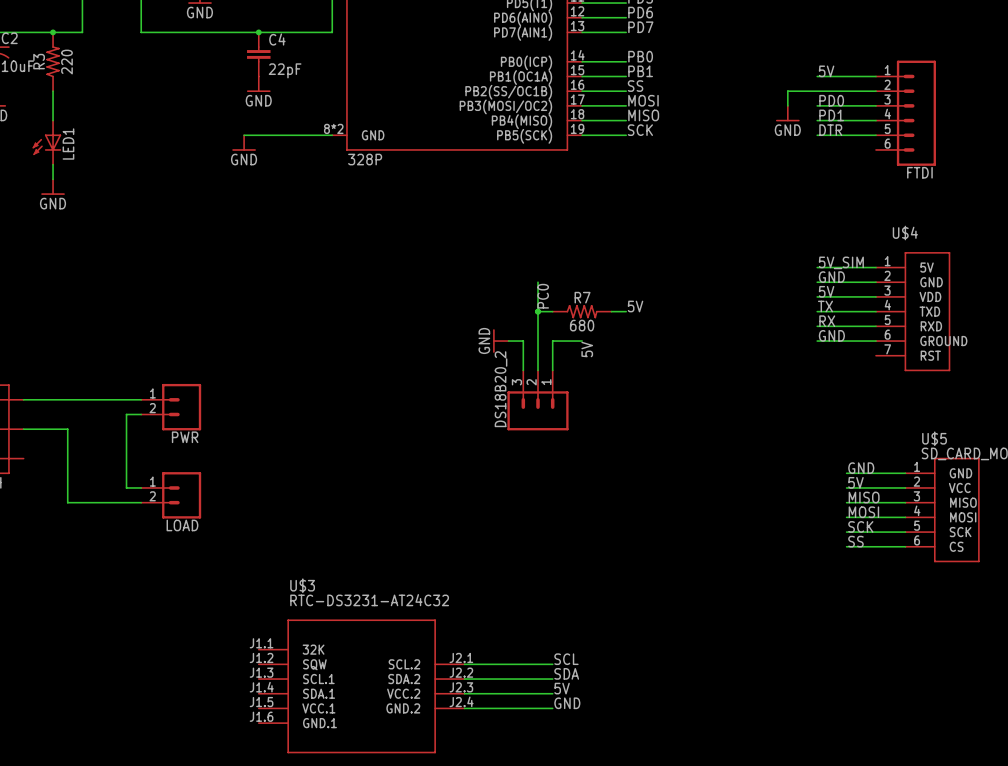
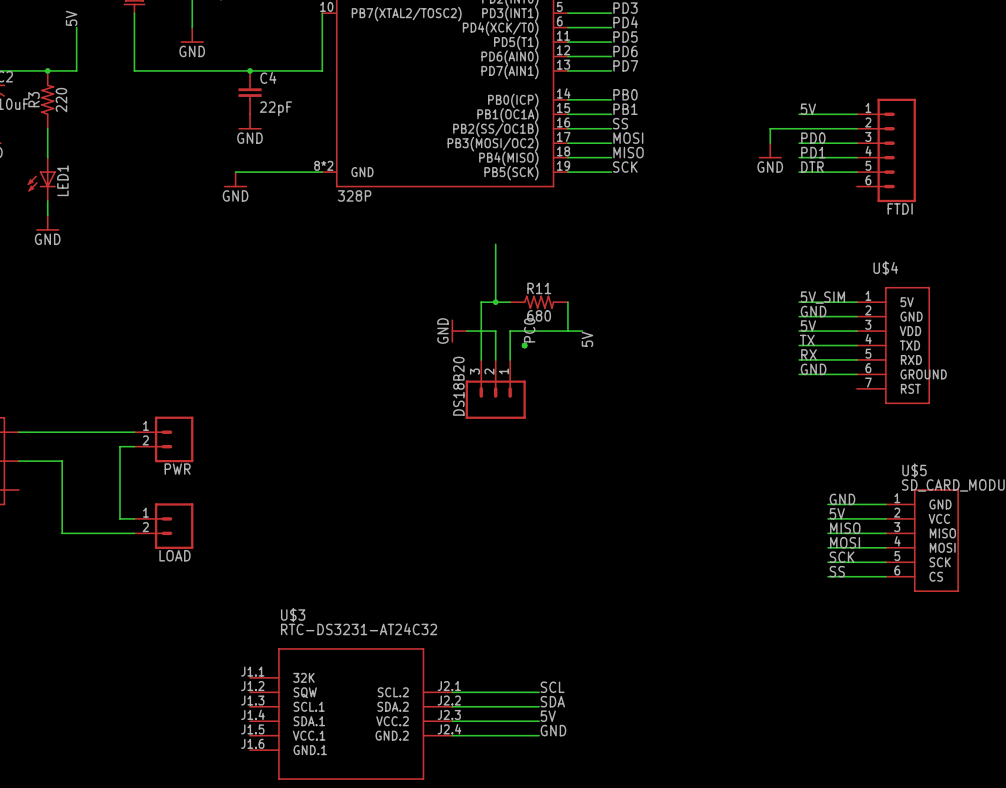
wire: none -> (495, 244) (495, 302)
junction: none -> (495, 302)
wire: none -> (510, 302) (481, 302) (481, 359)
R11: none -> 680 (539, 302)
wire: none -> (567, 302) (567, 331)
wire: (538, 282) (538, 370) -> none
wire: none -> (466, 331) (495, 331) (495, 359)
wire: none -> (582, 331) (510, 331) (510, 359)
label: none -> 5V (587, 339)
label: 5V (635, 306) -> none
wire: (538, 311) (552, 311) -> none
R7: 680 (582, 311) -> none
wire: (611, 311) (626, 311) -> none
power symbol position: GND (500, 341) -> GND (459, 331)
wire: (508, 341) (523, 341) (523, 370) -> none
wire: (582, 341) (552, 341) (552, 370) -> none
label: 5V (587, 349) -> none
DS18B20: none -> (495, 389)
DS18B20_2: (538, 400) -> none

